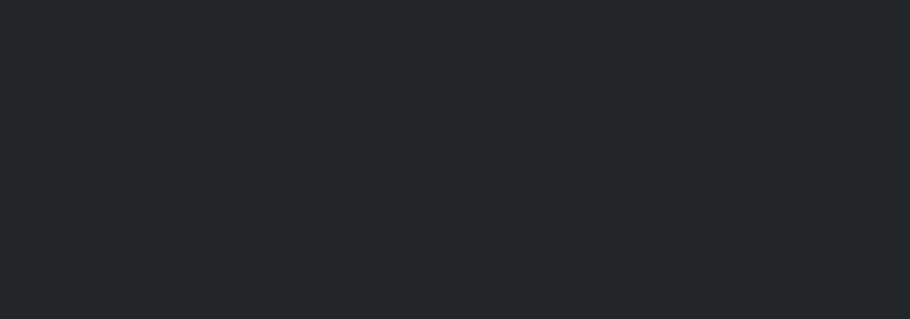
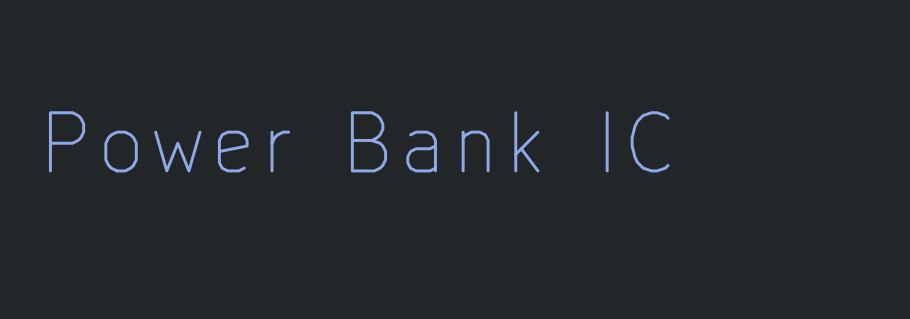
text: none -> Power Bank IC (359, 141)

